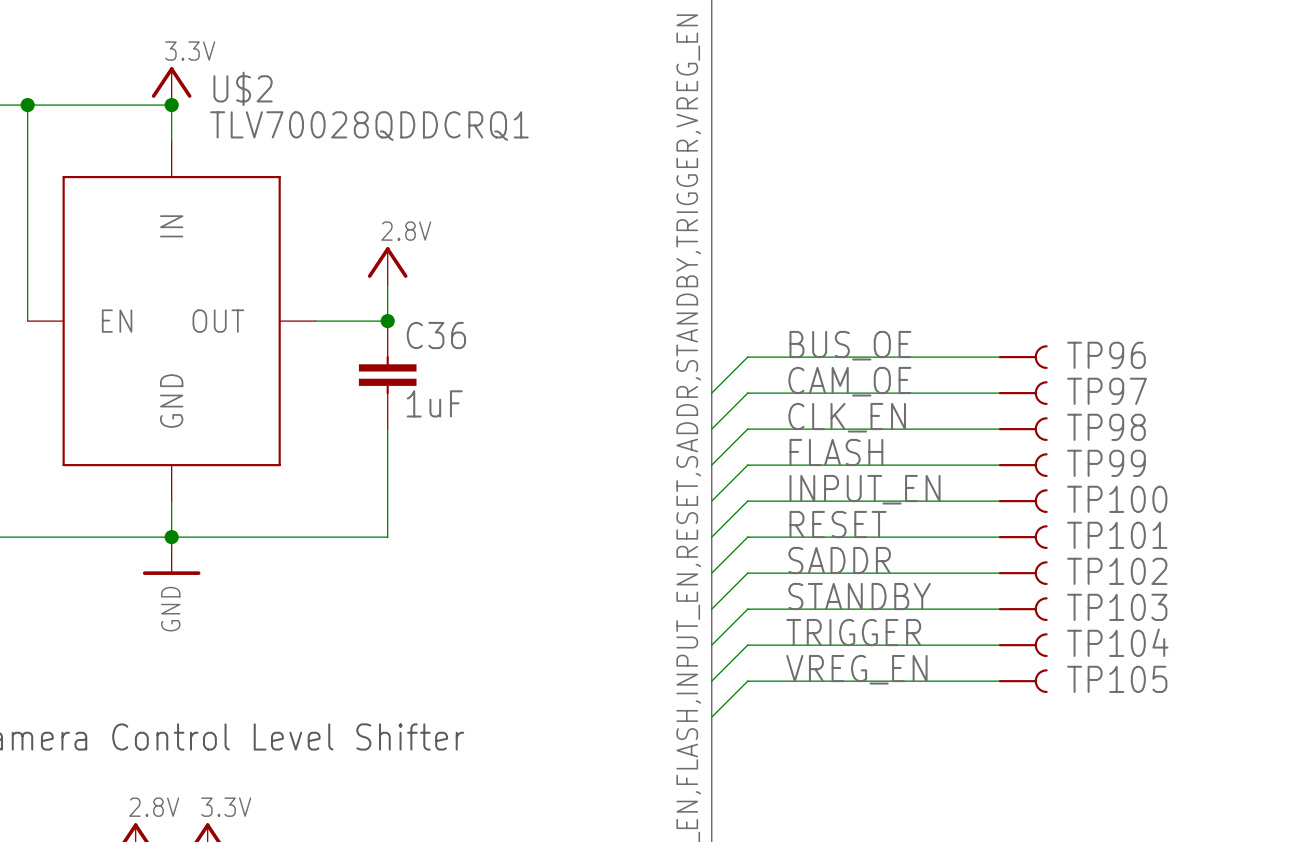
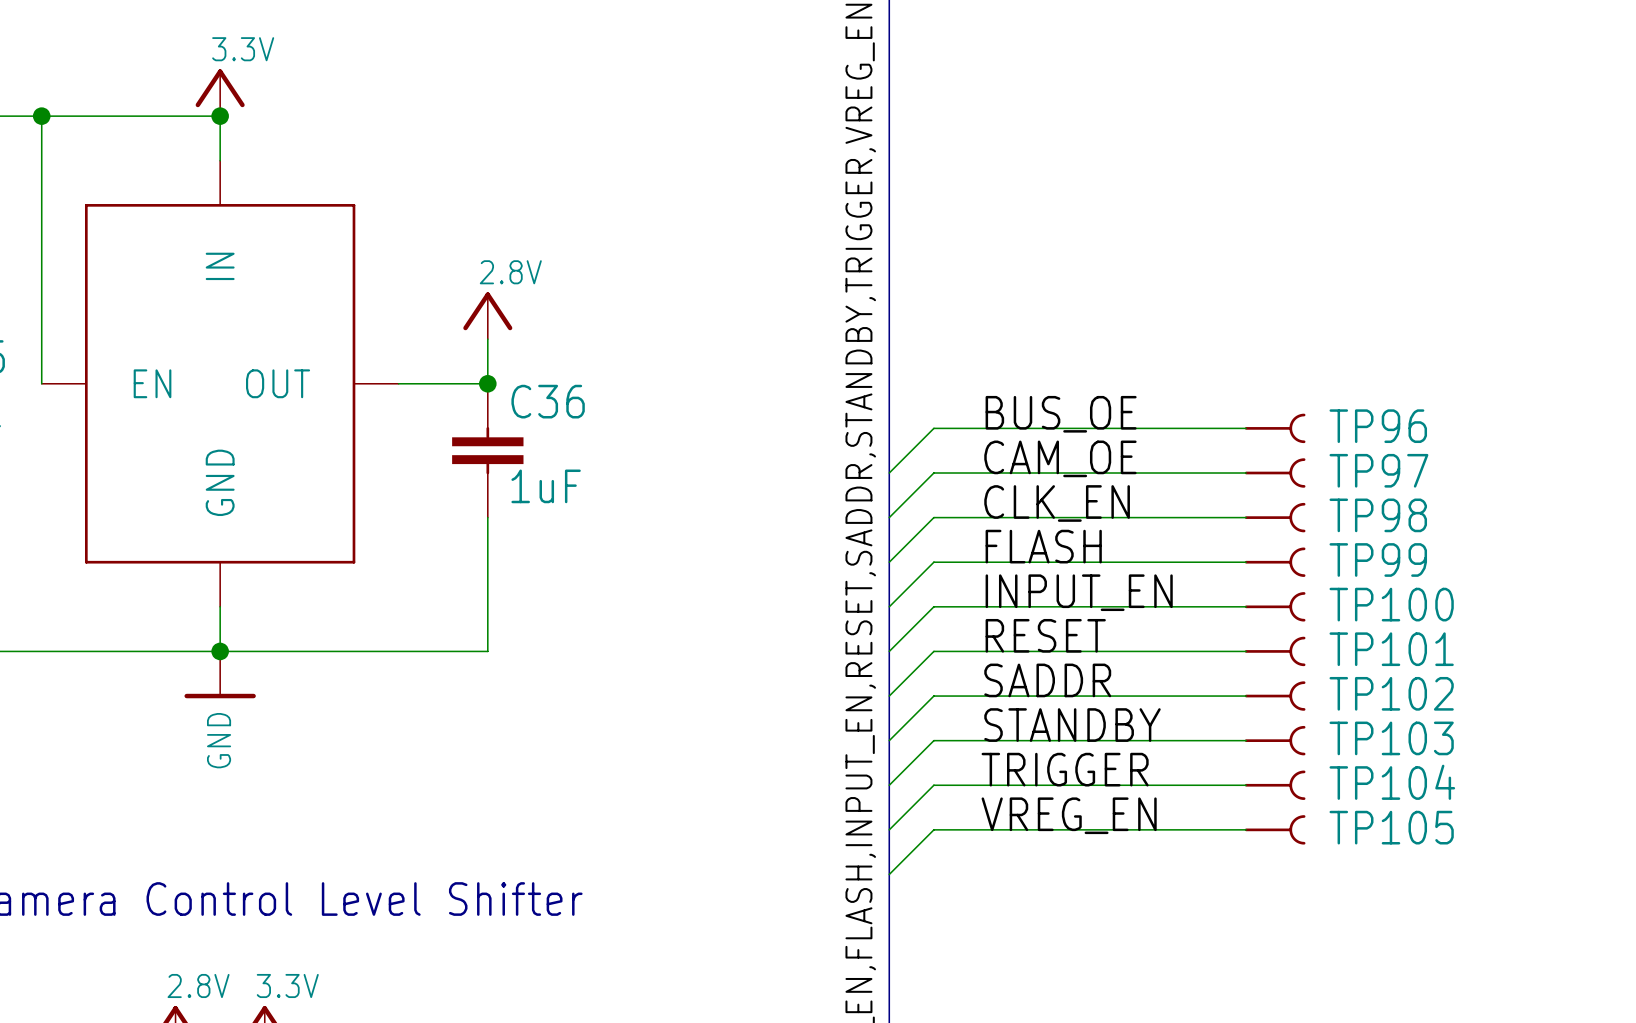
U$2 name: U$2 (243, 88) -> none
U$2 value: TLV70028QDDCRQ1 (369, 126) -> none

